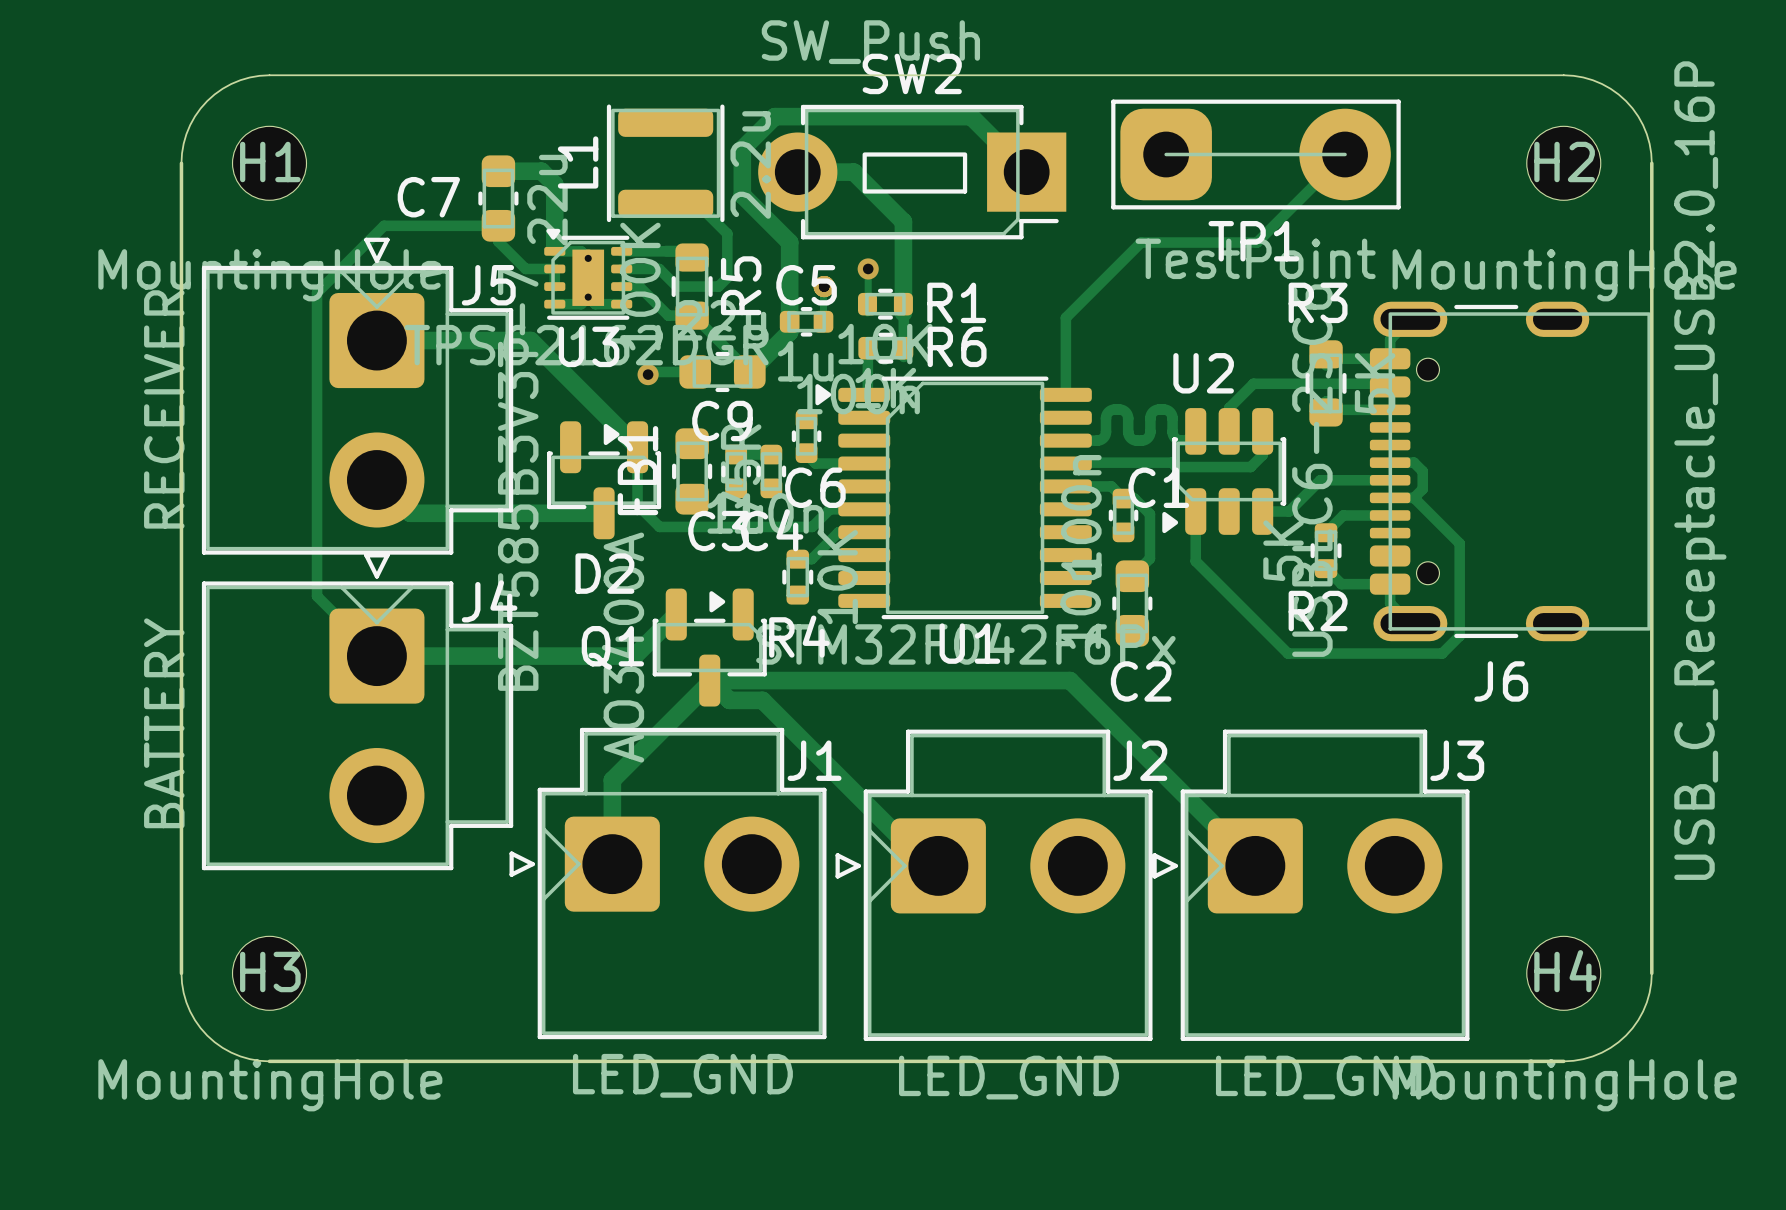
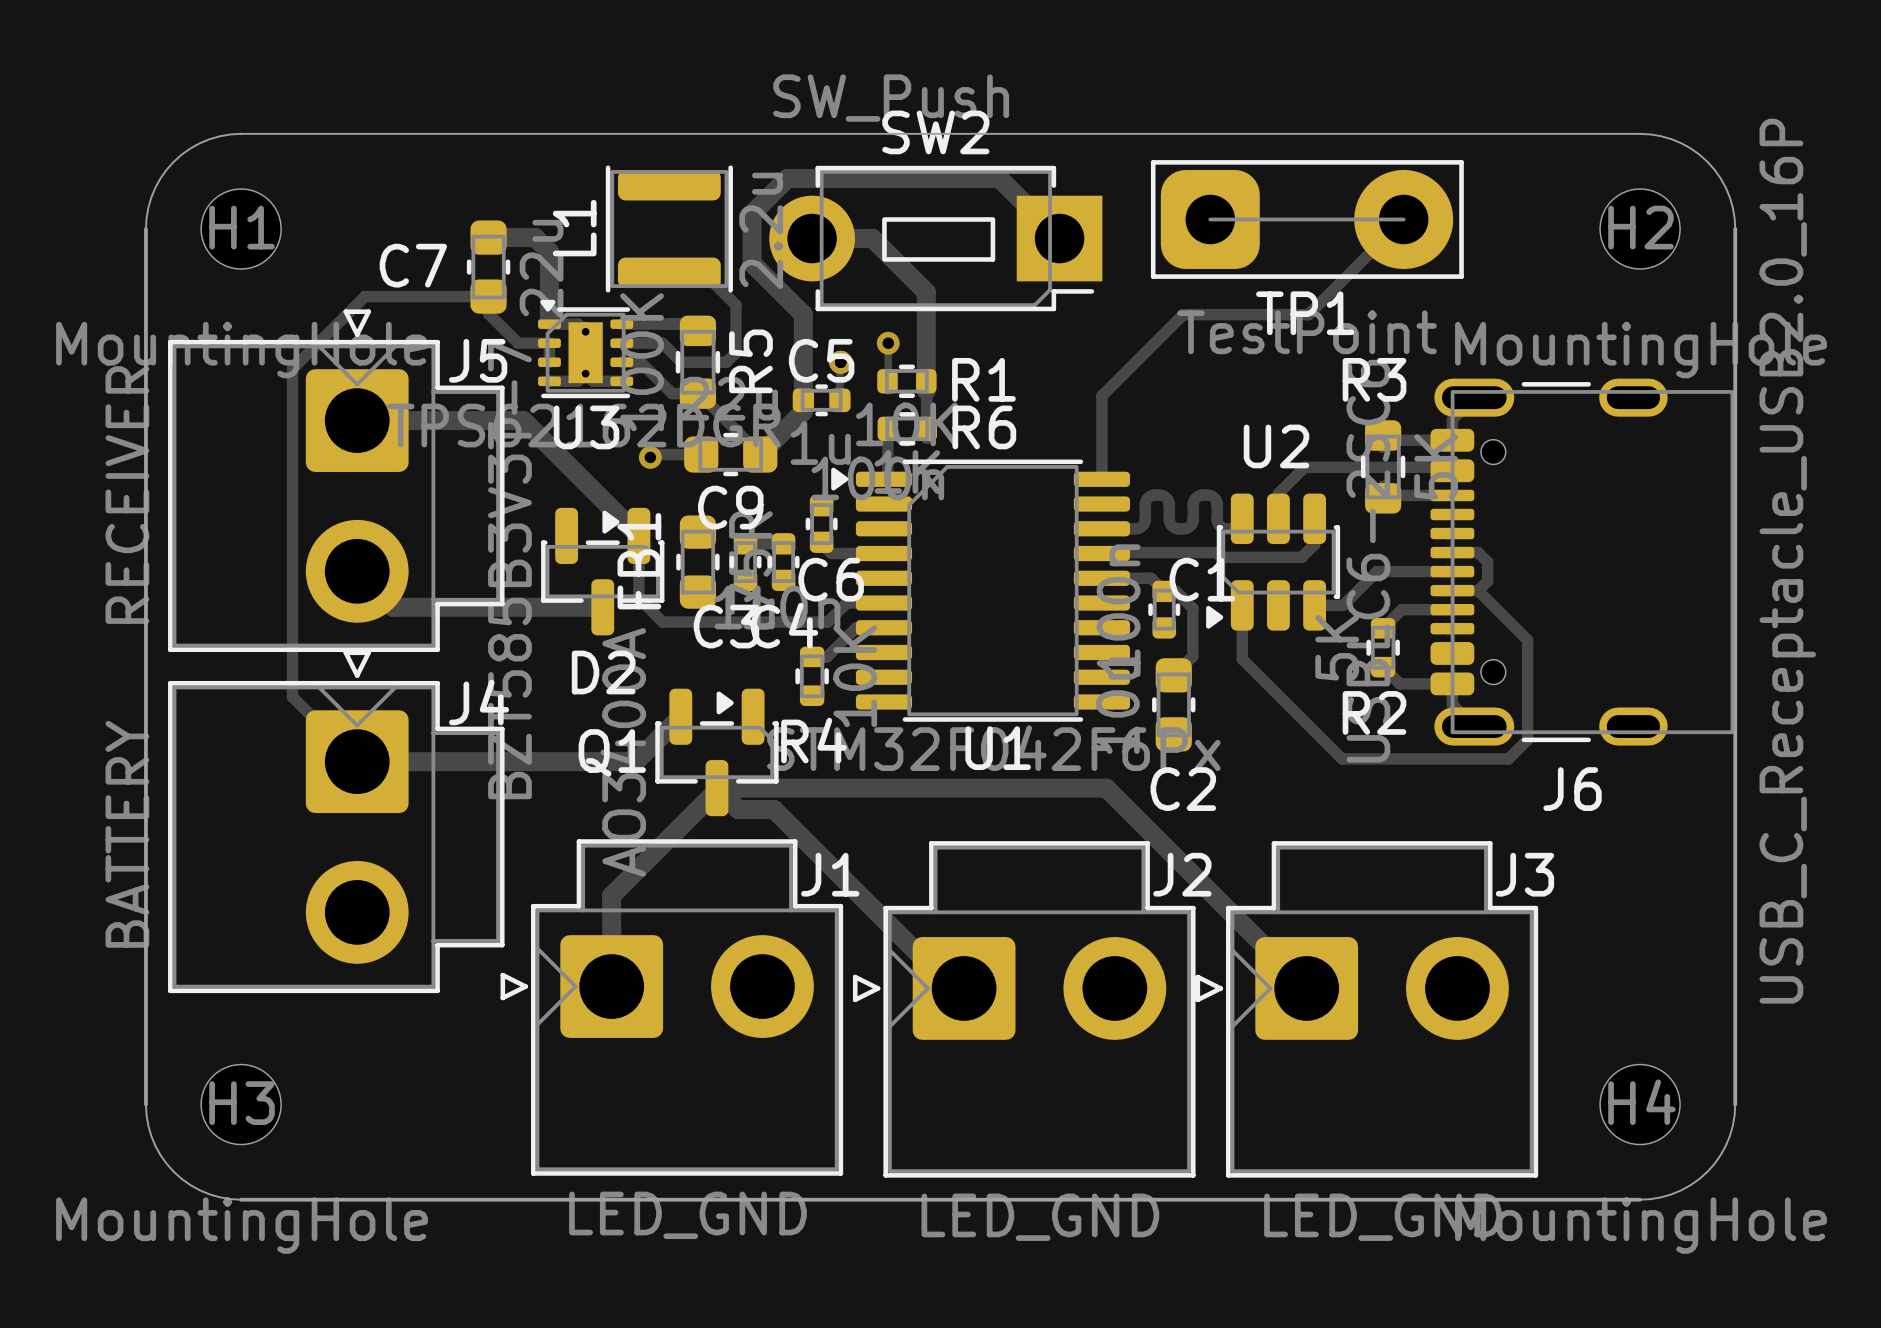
U2 name position: U2 (1203, 373) -> U2 (1276, 446)

